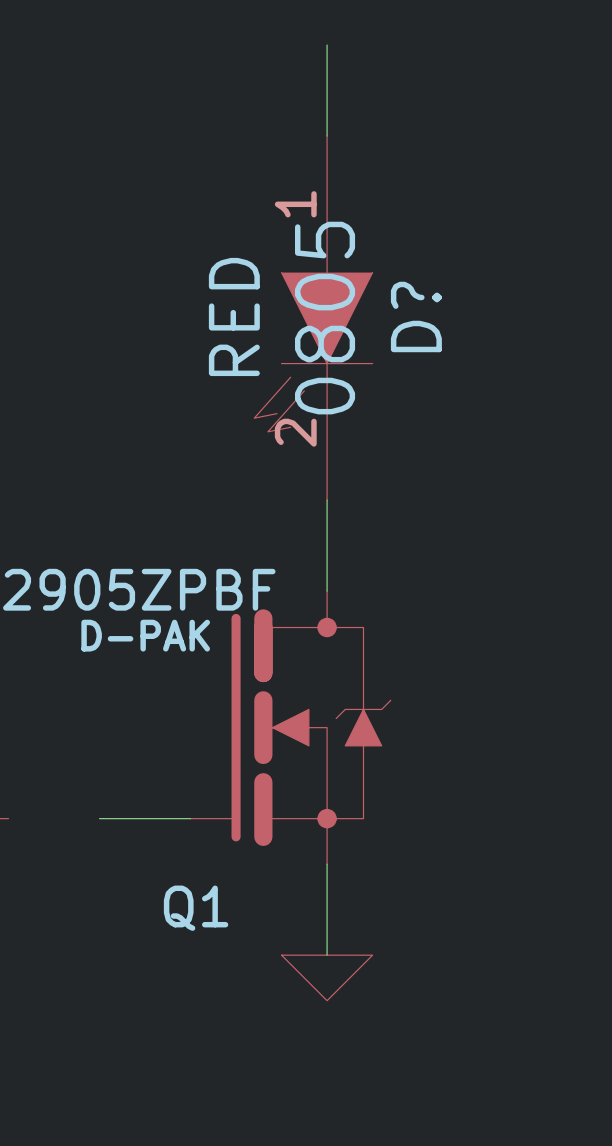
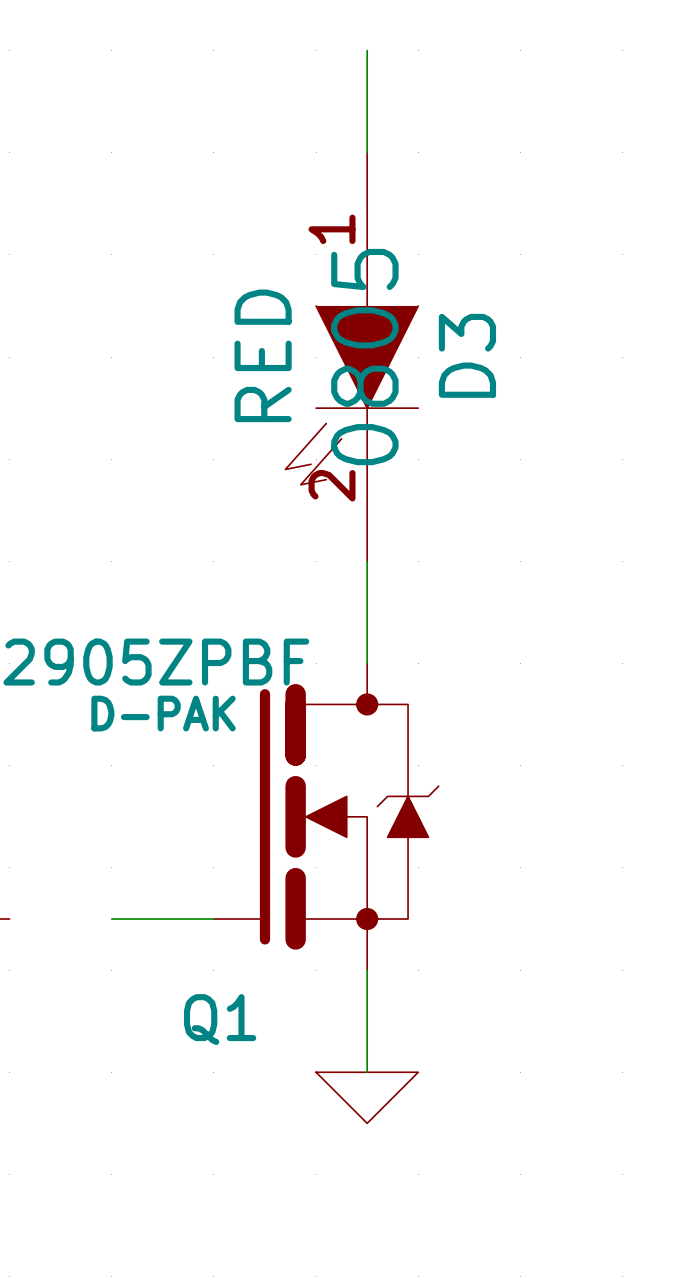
D? name: D? (416, 316) -> D3 (467, 355)

